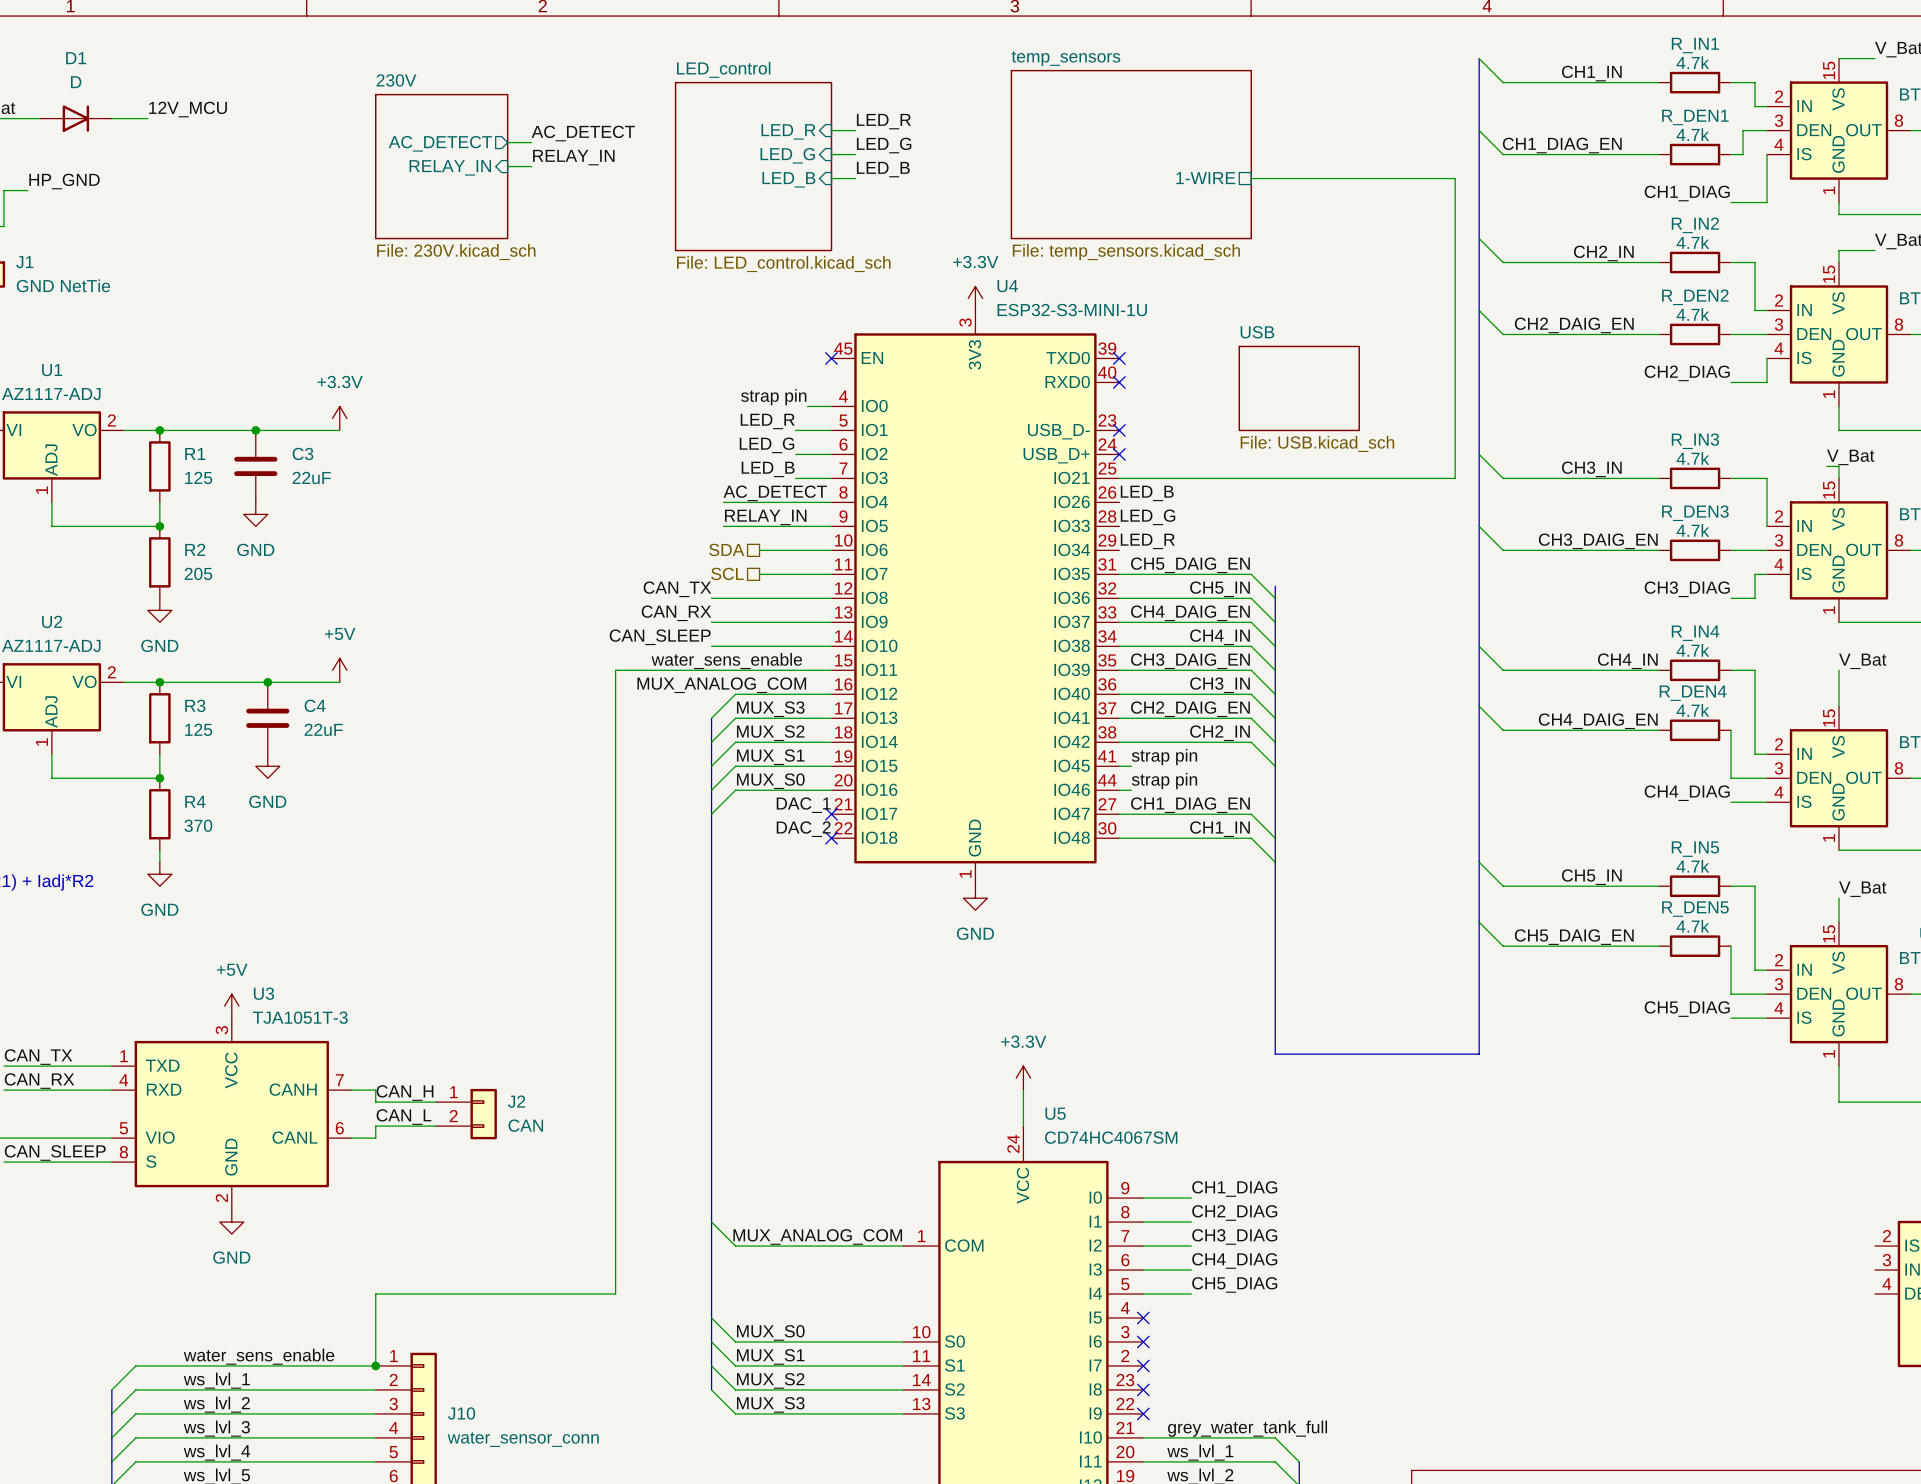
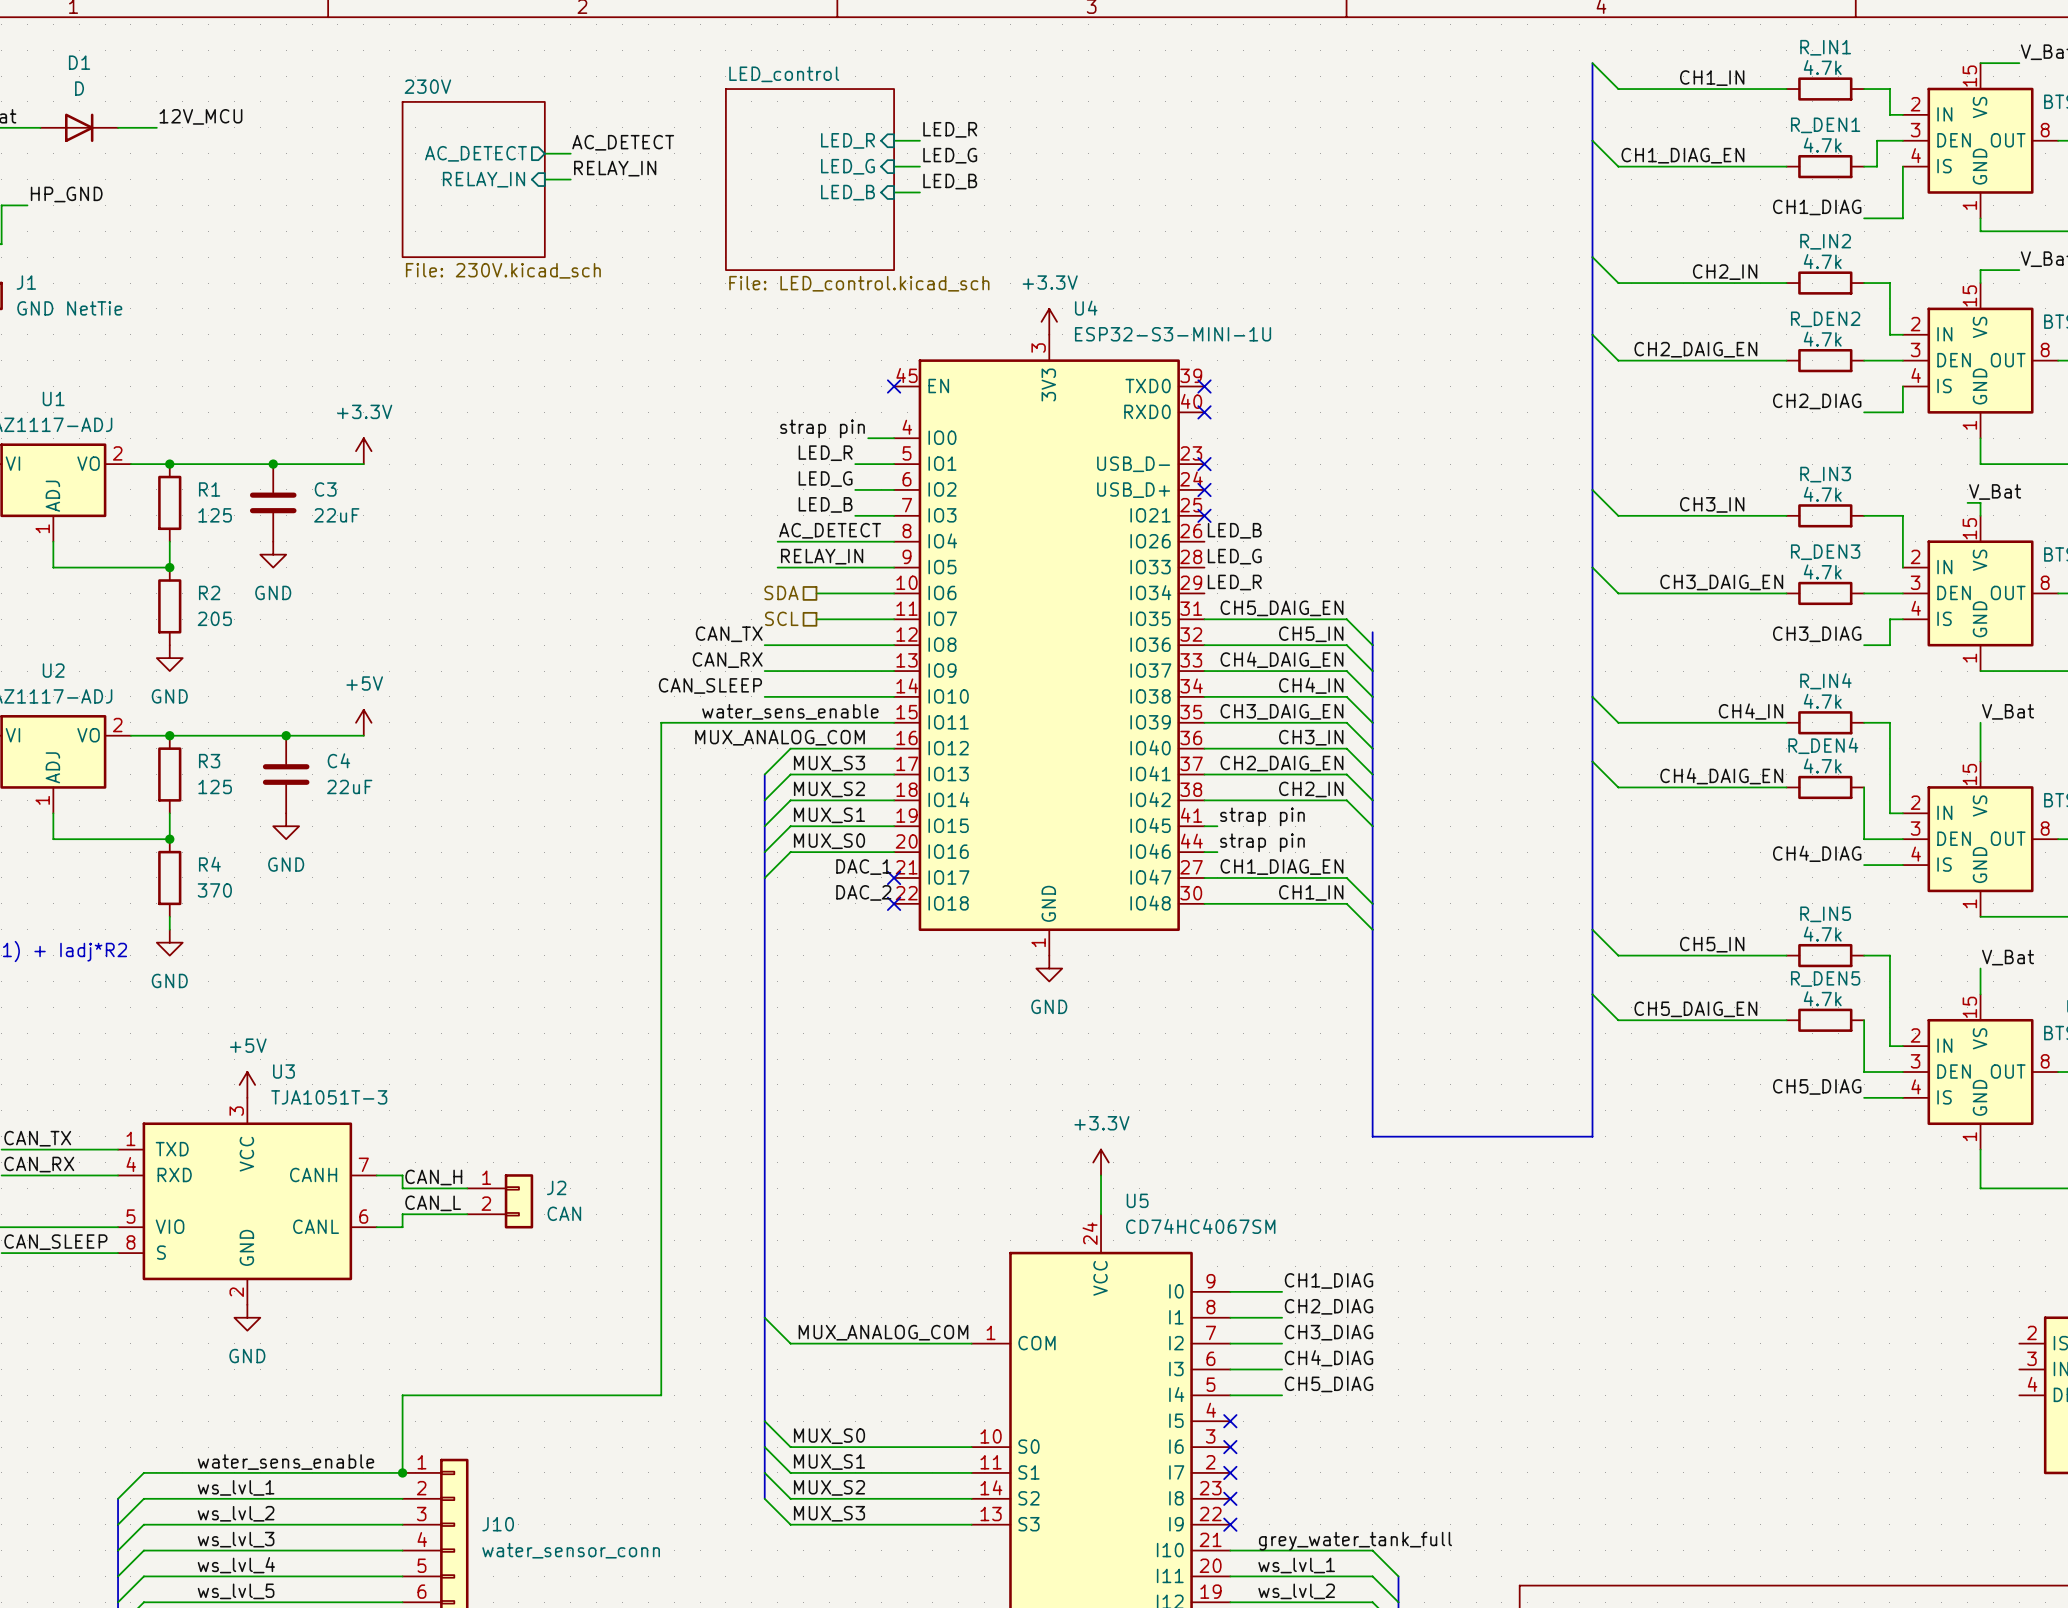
sheet temp_sensors: File: temp_sensors.kicad_sch (1131, 154) -> none
sheet pin: 1-WIRE (1205, 178) -> none
wire: (1251, 178) (1455, 178) (1455, 478) (1119, 478) -> none
sheet USB: File: USB.kicad_sch (1299, 388) -> none
no-connect mark: none -> (1204, 515)

